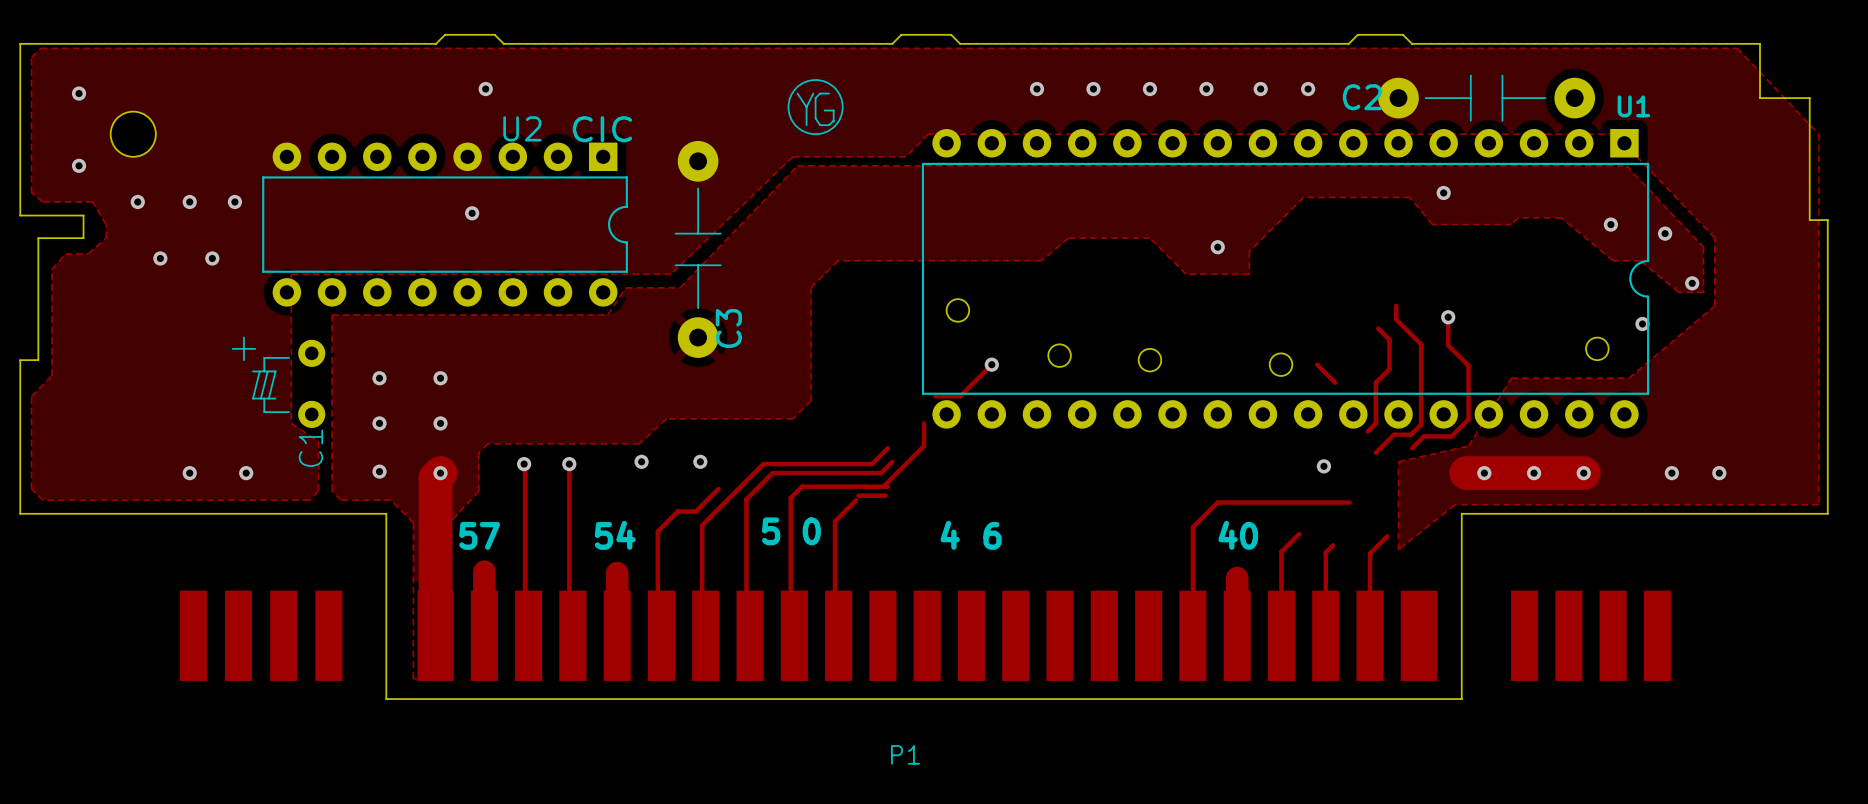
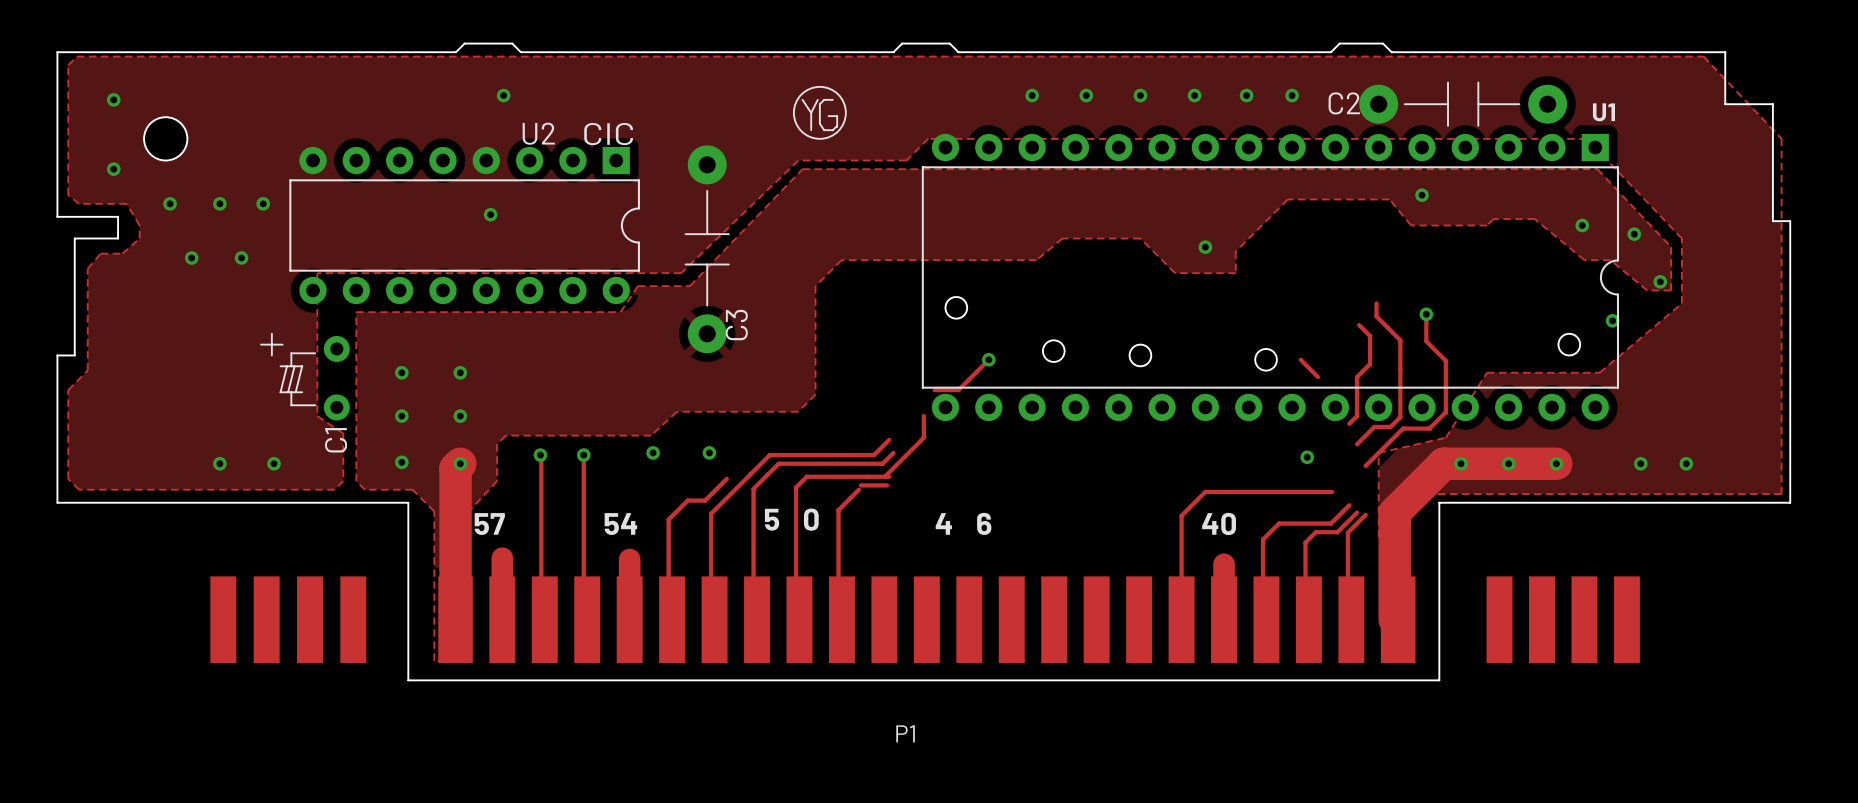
track: none -> (1391, 439) (1365, 465)
track: none -> (1443, 463) (1394, 512) (1394, 619)
track: none -> (1349, 505) (1331, 523) (1279, 523) (1263, 539) (1263, 601)
track: none -> (1357, 512) (1337, 532) (1315, 532) (1305, 542) (1305, 601)
track: none -> (1365, 514) (1347, 532) (1347, 601)
track: (1299, 534) (1281, 551) (1281, 635) -> none
track: (1387, 536) (1370, 553) (1370, 635) -> none
track: (1332, 545) (1325, 552) (1325, 635) -> none

